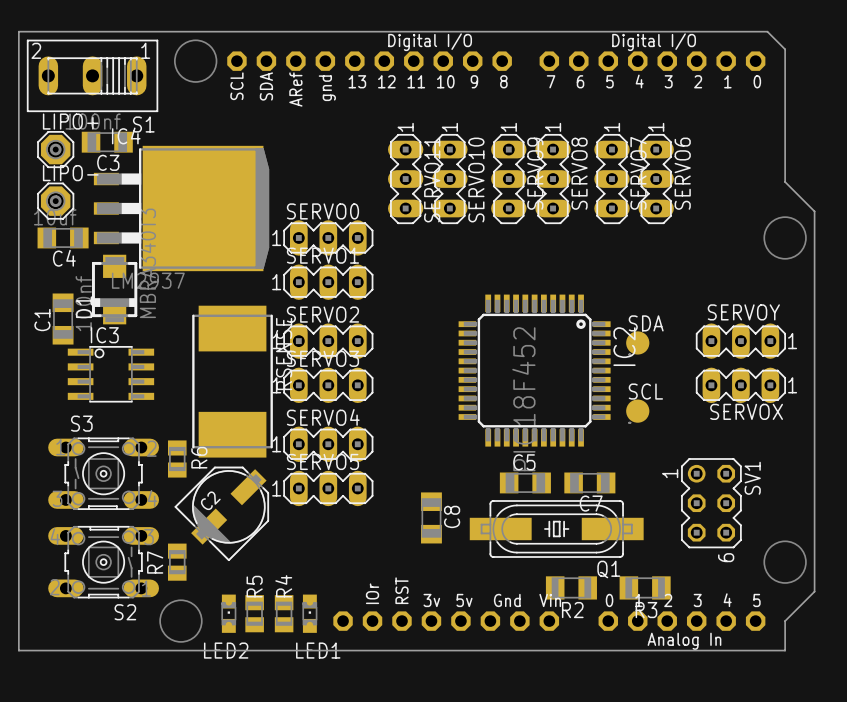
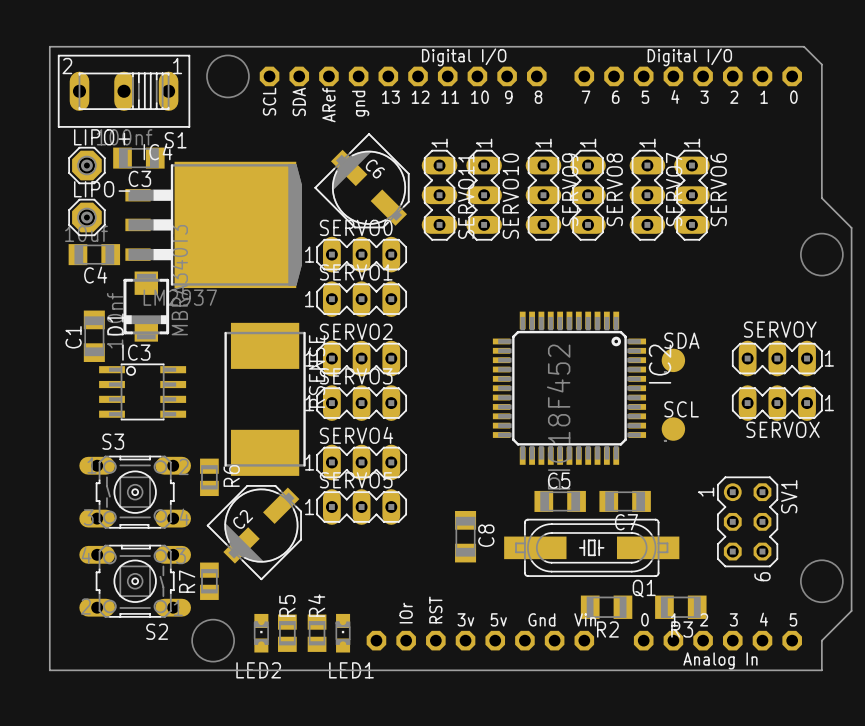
C6: none -> (361, 180)

